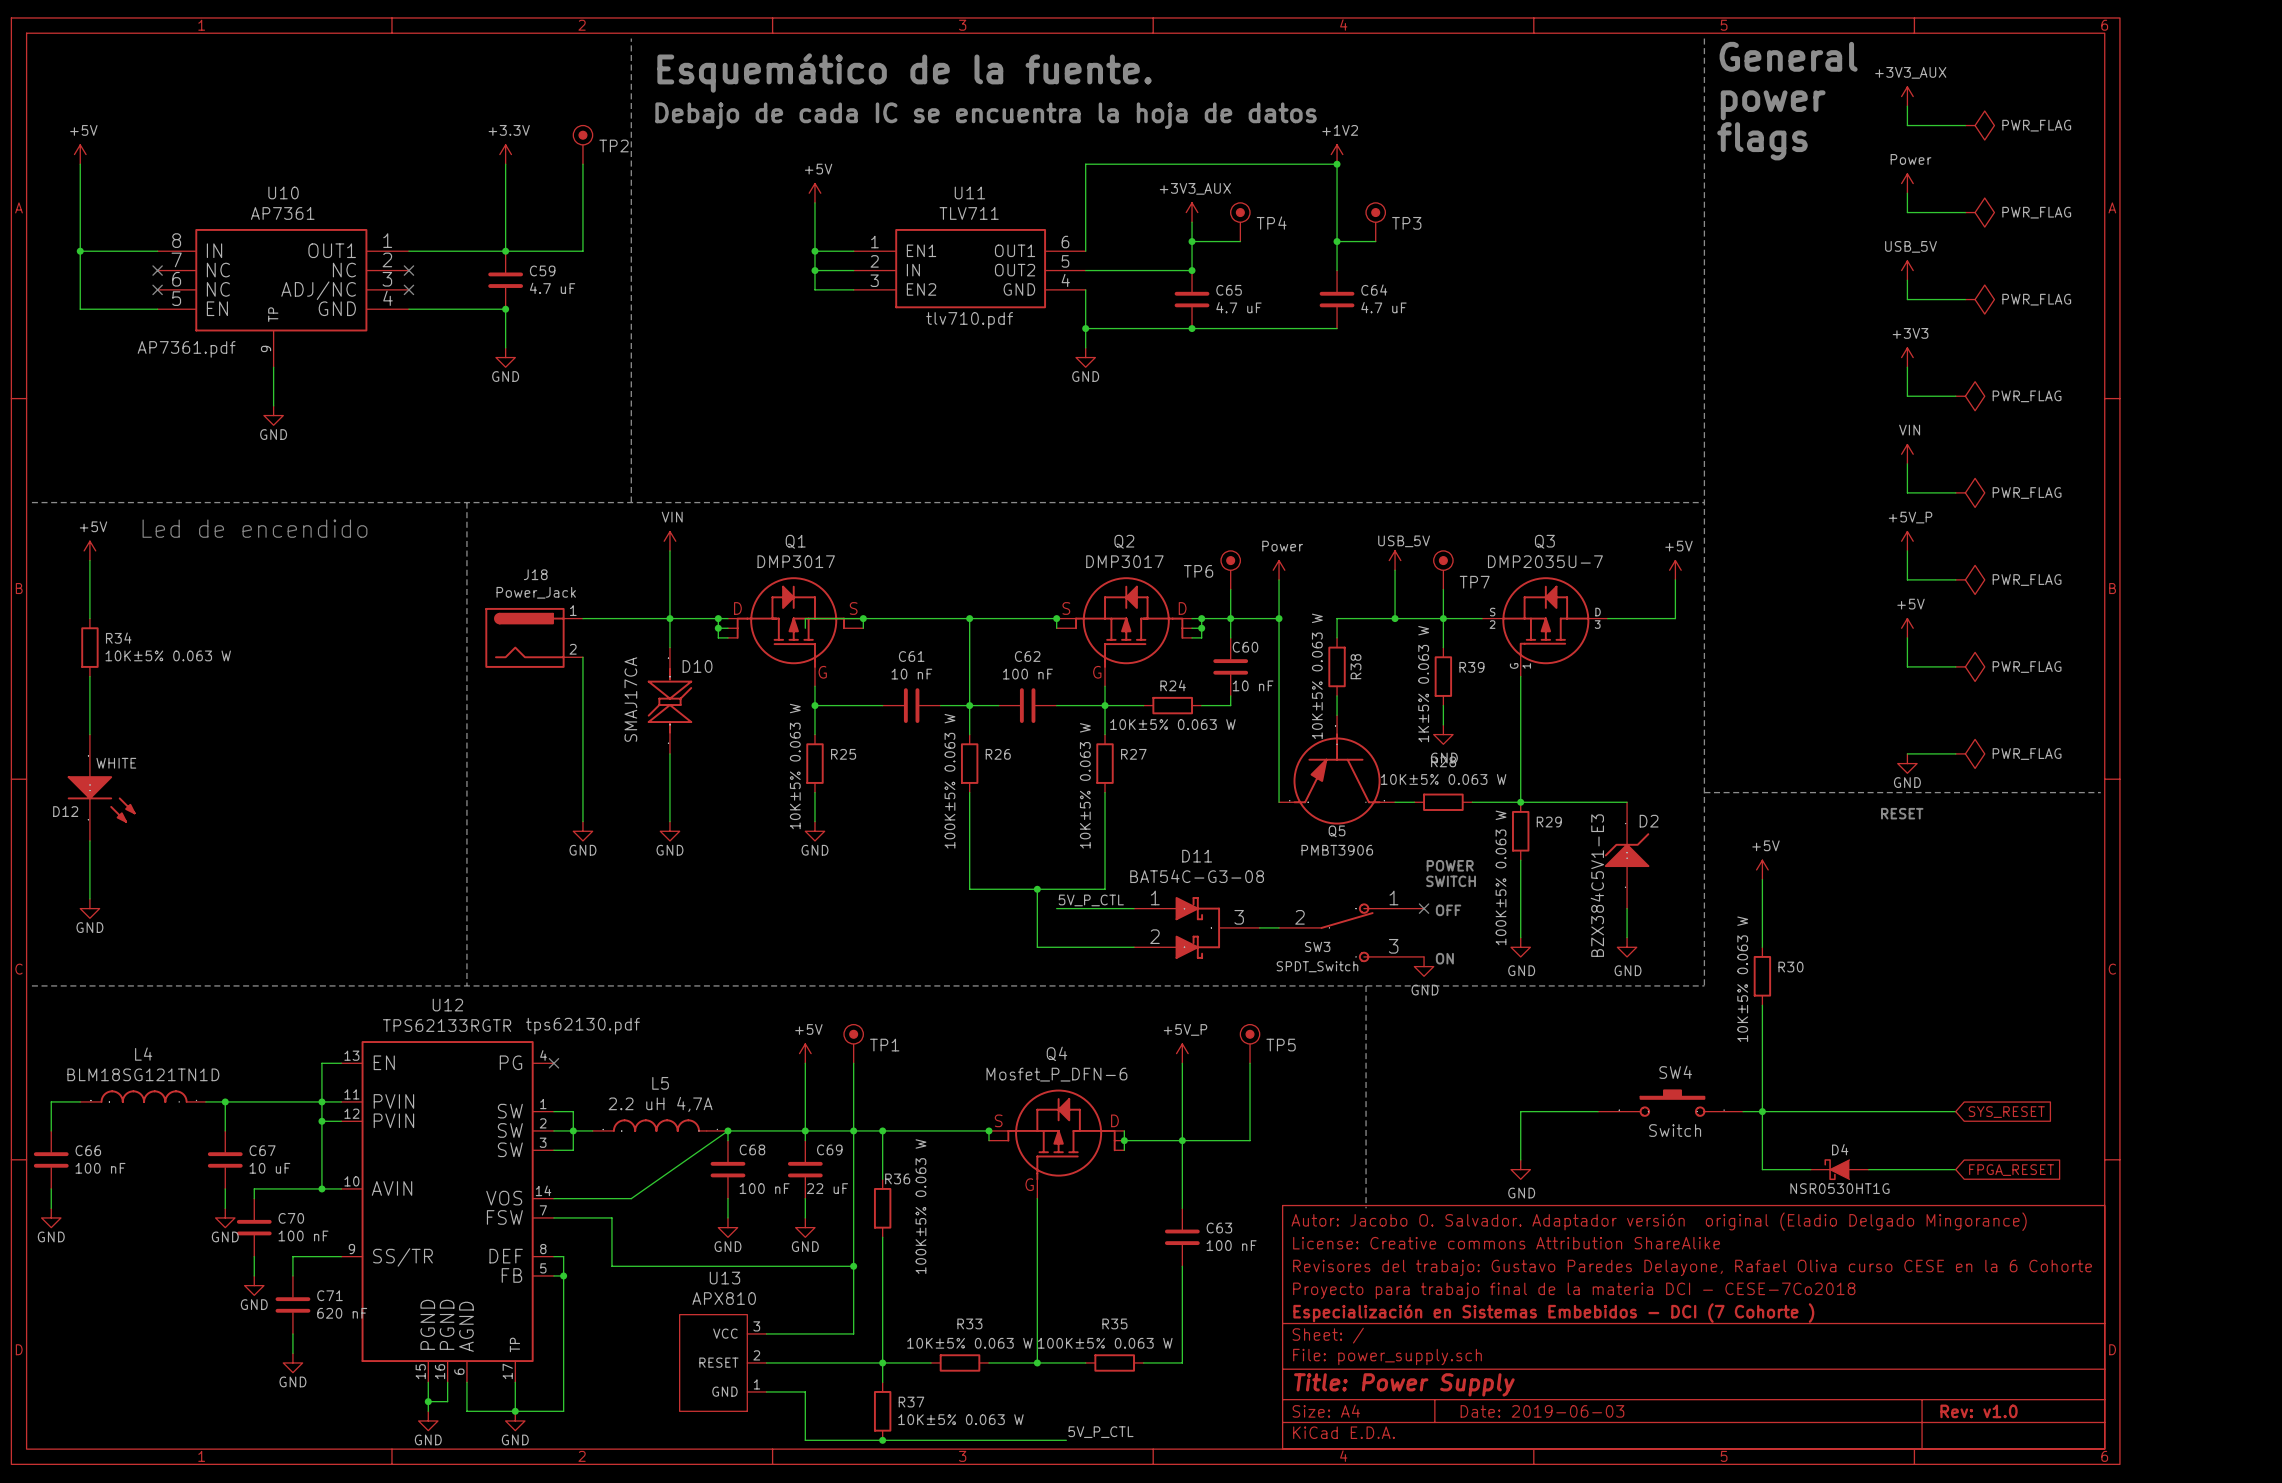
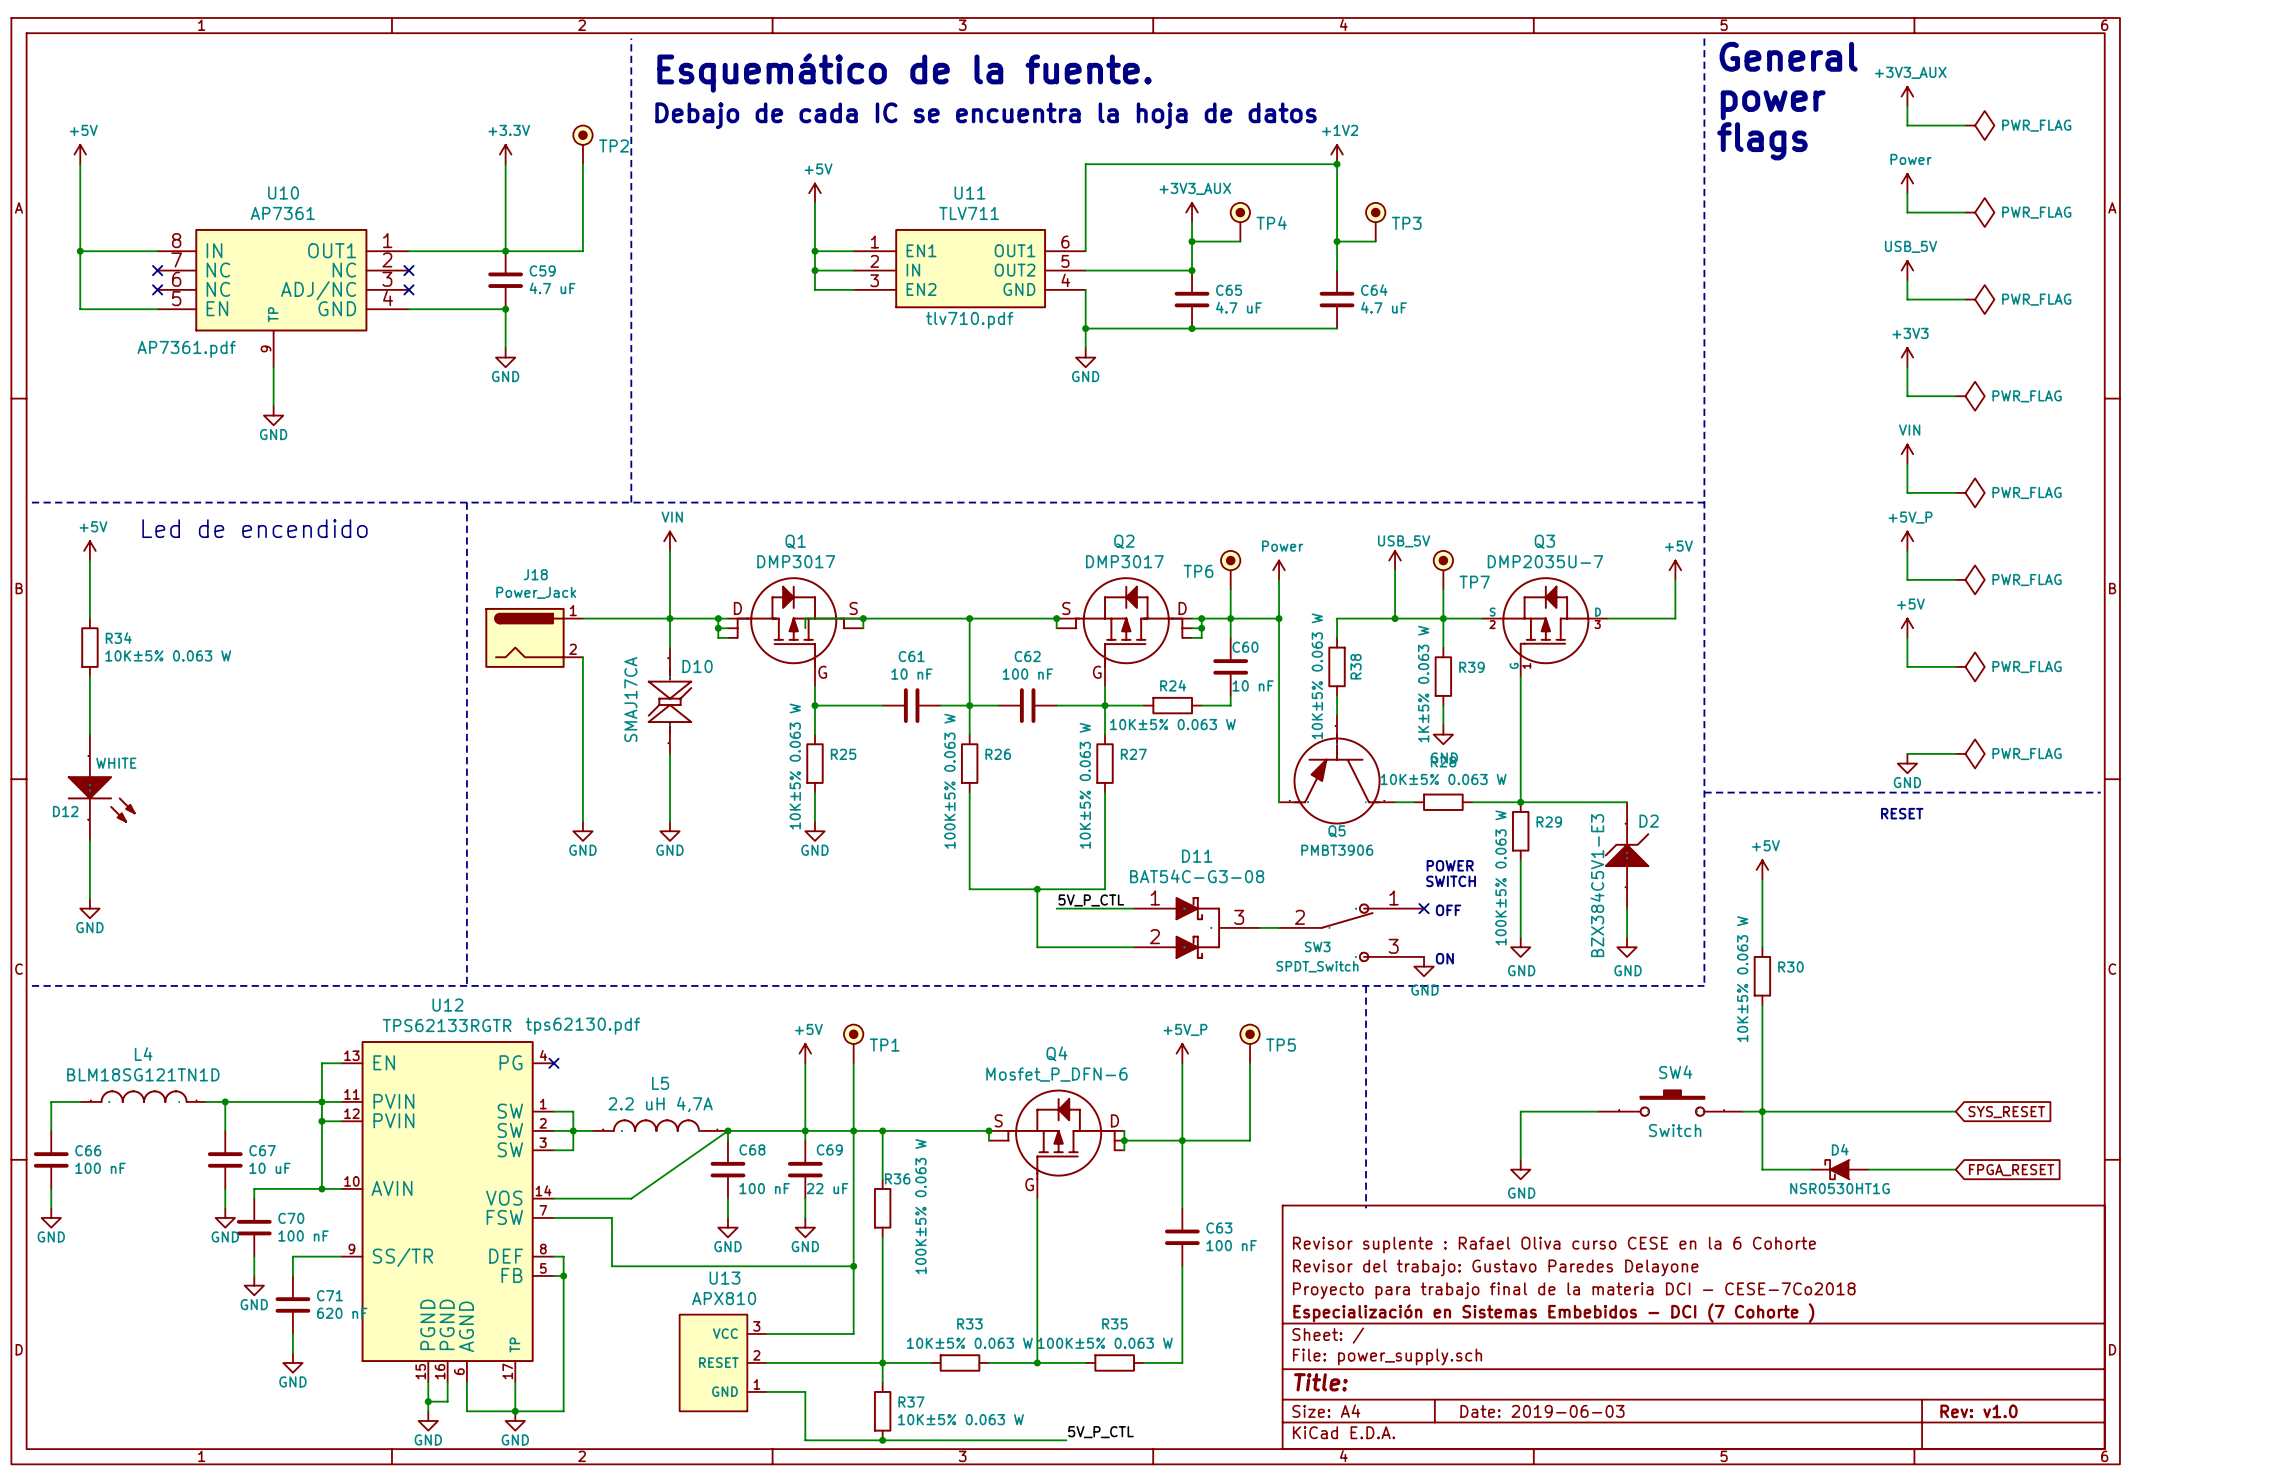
title block: Autor: Jacobo O. Salvador. Adaptador versión original (Eladio Delgado Mingorance) (1659, 1221) -> none
title block: License: Creative commons Attribution ShareAlike (1506, 1243) -> Revisor suplente : Rafael Oliva curso CESE en la 6 Cohorte (1554, 1245)
title block: Revisores del trabajo: Gustavo Paredes Delayone, Rafael Oliva curso CESE en la 6 Cohorte (1692, 1267) -> Revisor del trabajo: Gustavo Paredes Delayone (1495, 1267)
title block: Title: Power Supply (1404, 1384) -> Title: (1320, 1382)

